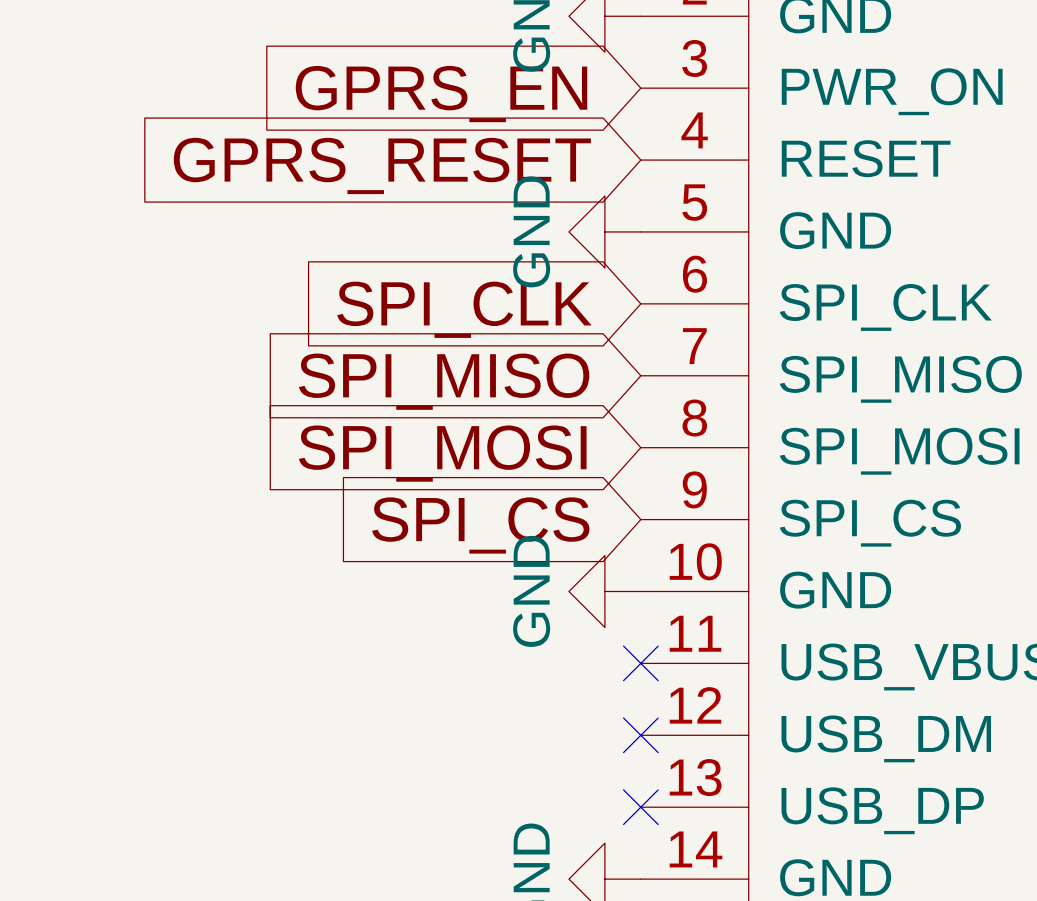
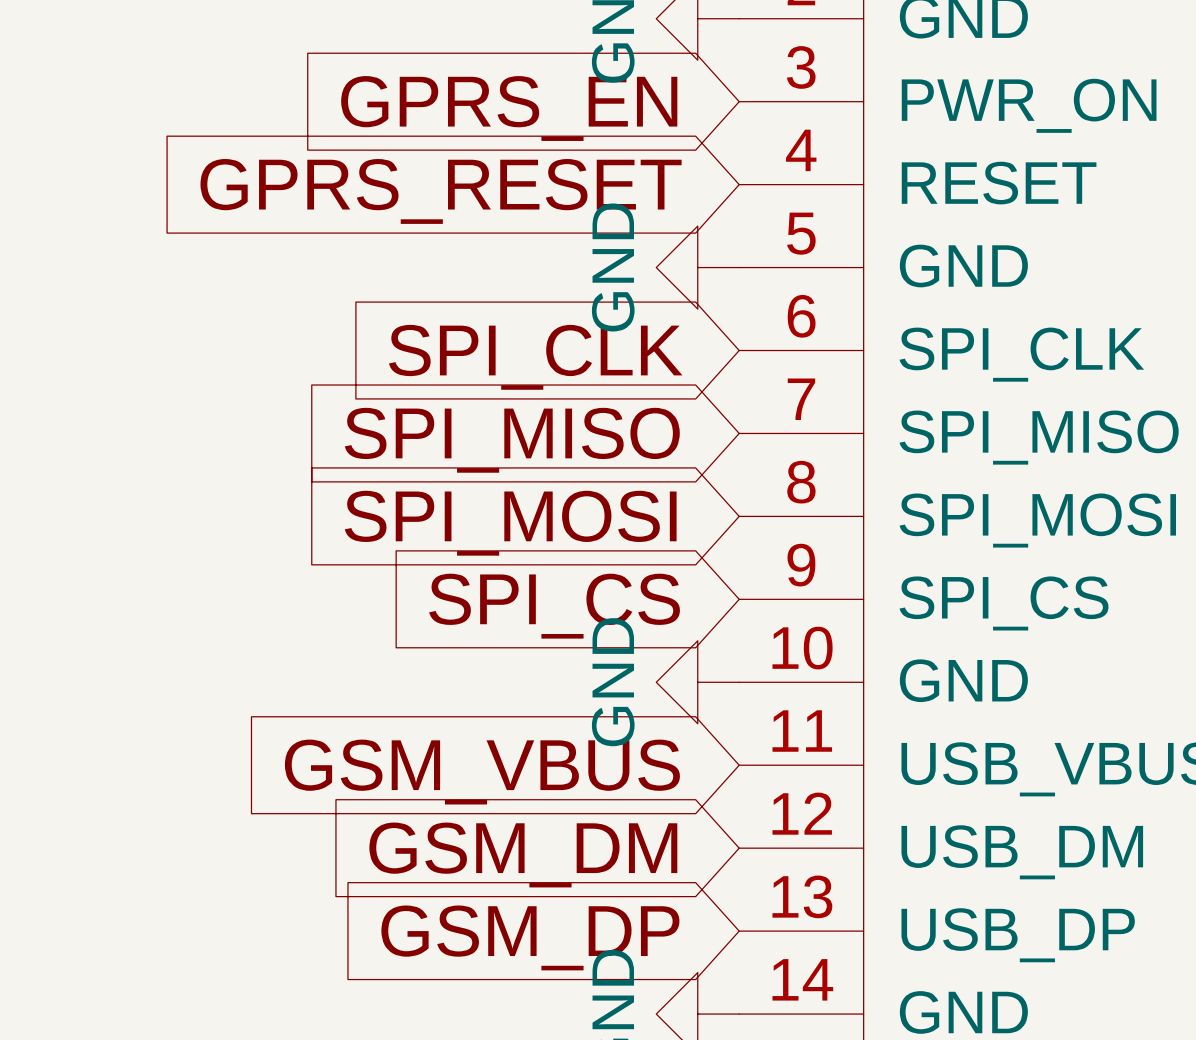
no-connect mark: (640, 663) -> none
global label: none -> GSM_VBUS (482, 772)
no-connect mark: (640, 735) -> none
global label: none -> GSM_DM (523, 854)
no-connect mark: (640, 807) -> none
global label: none -> GSM_DP (530, 937)

